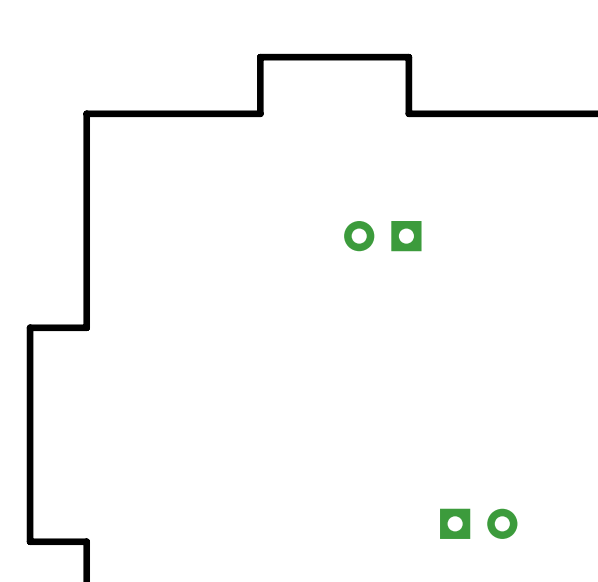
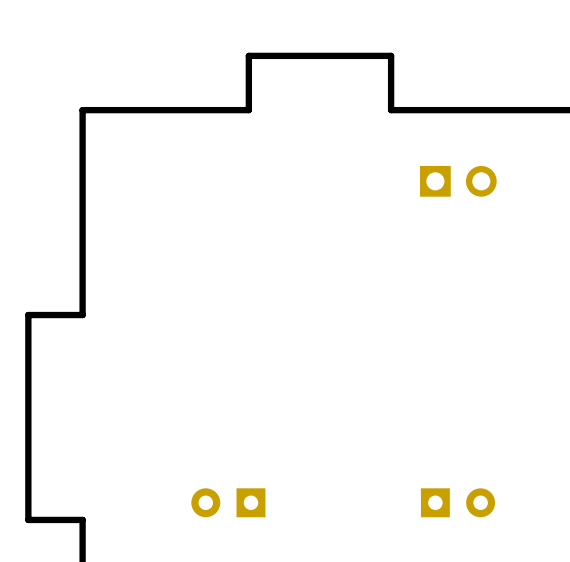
part: none -> (458, 181)
part position: (382, 236) -> (228, 502)

